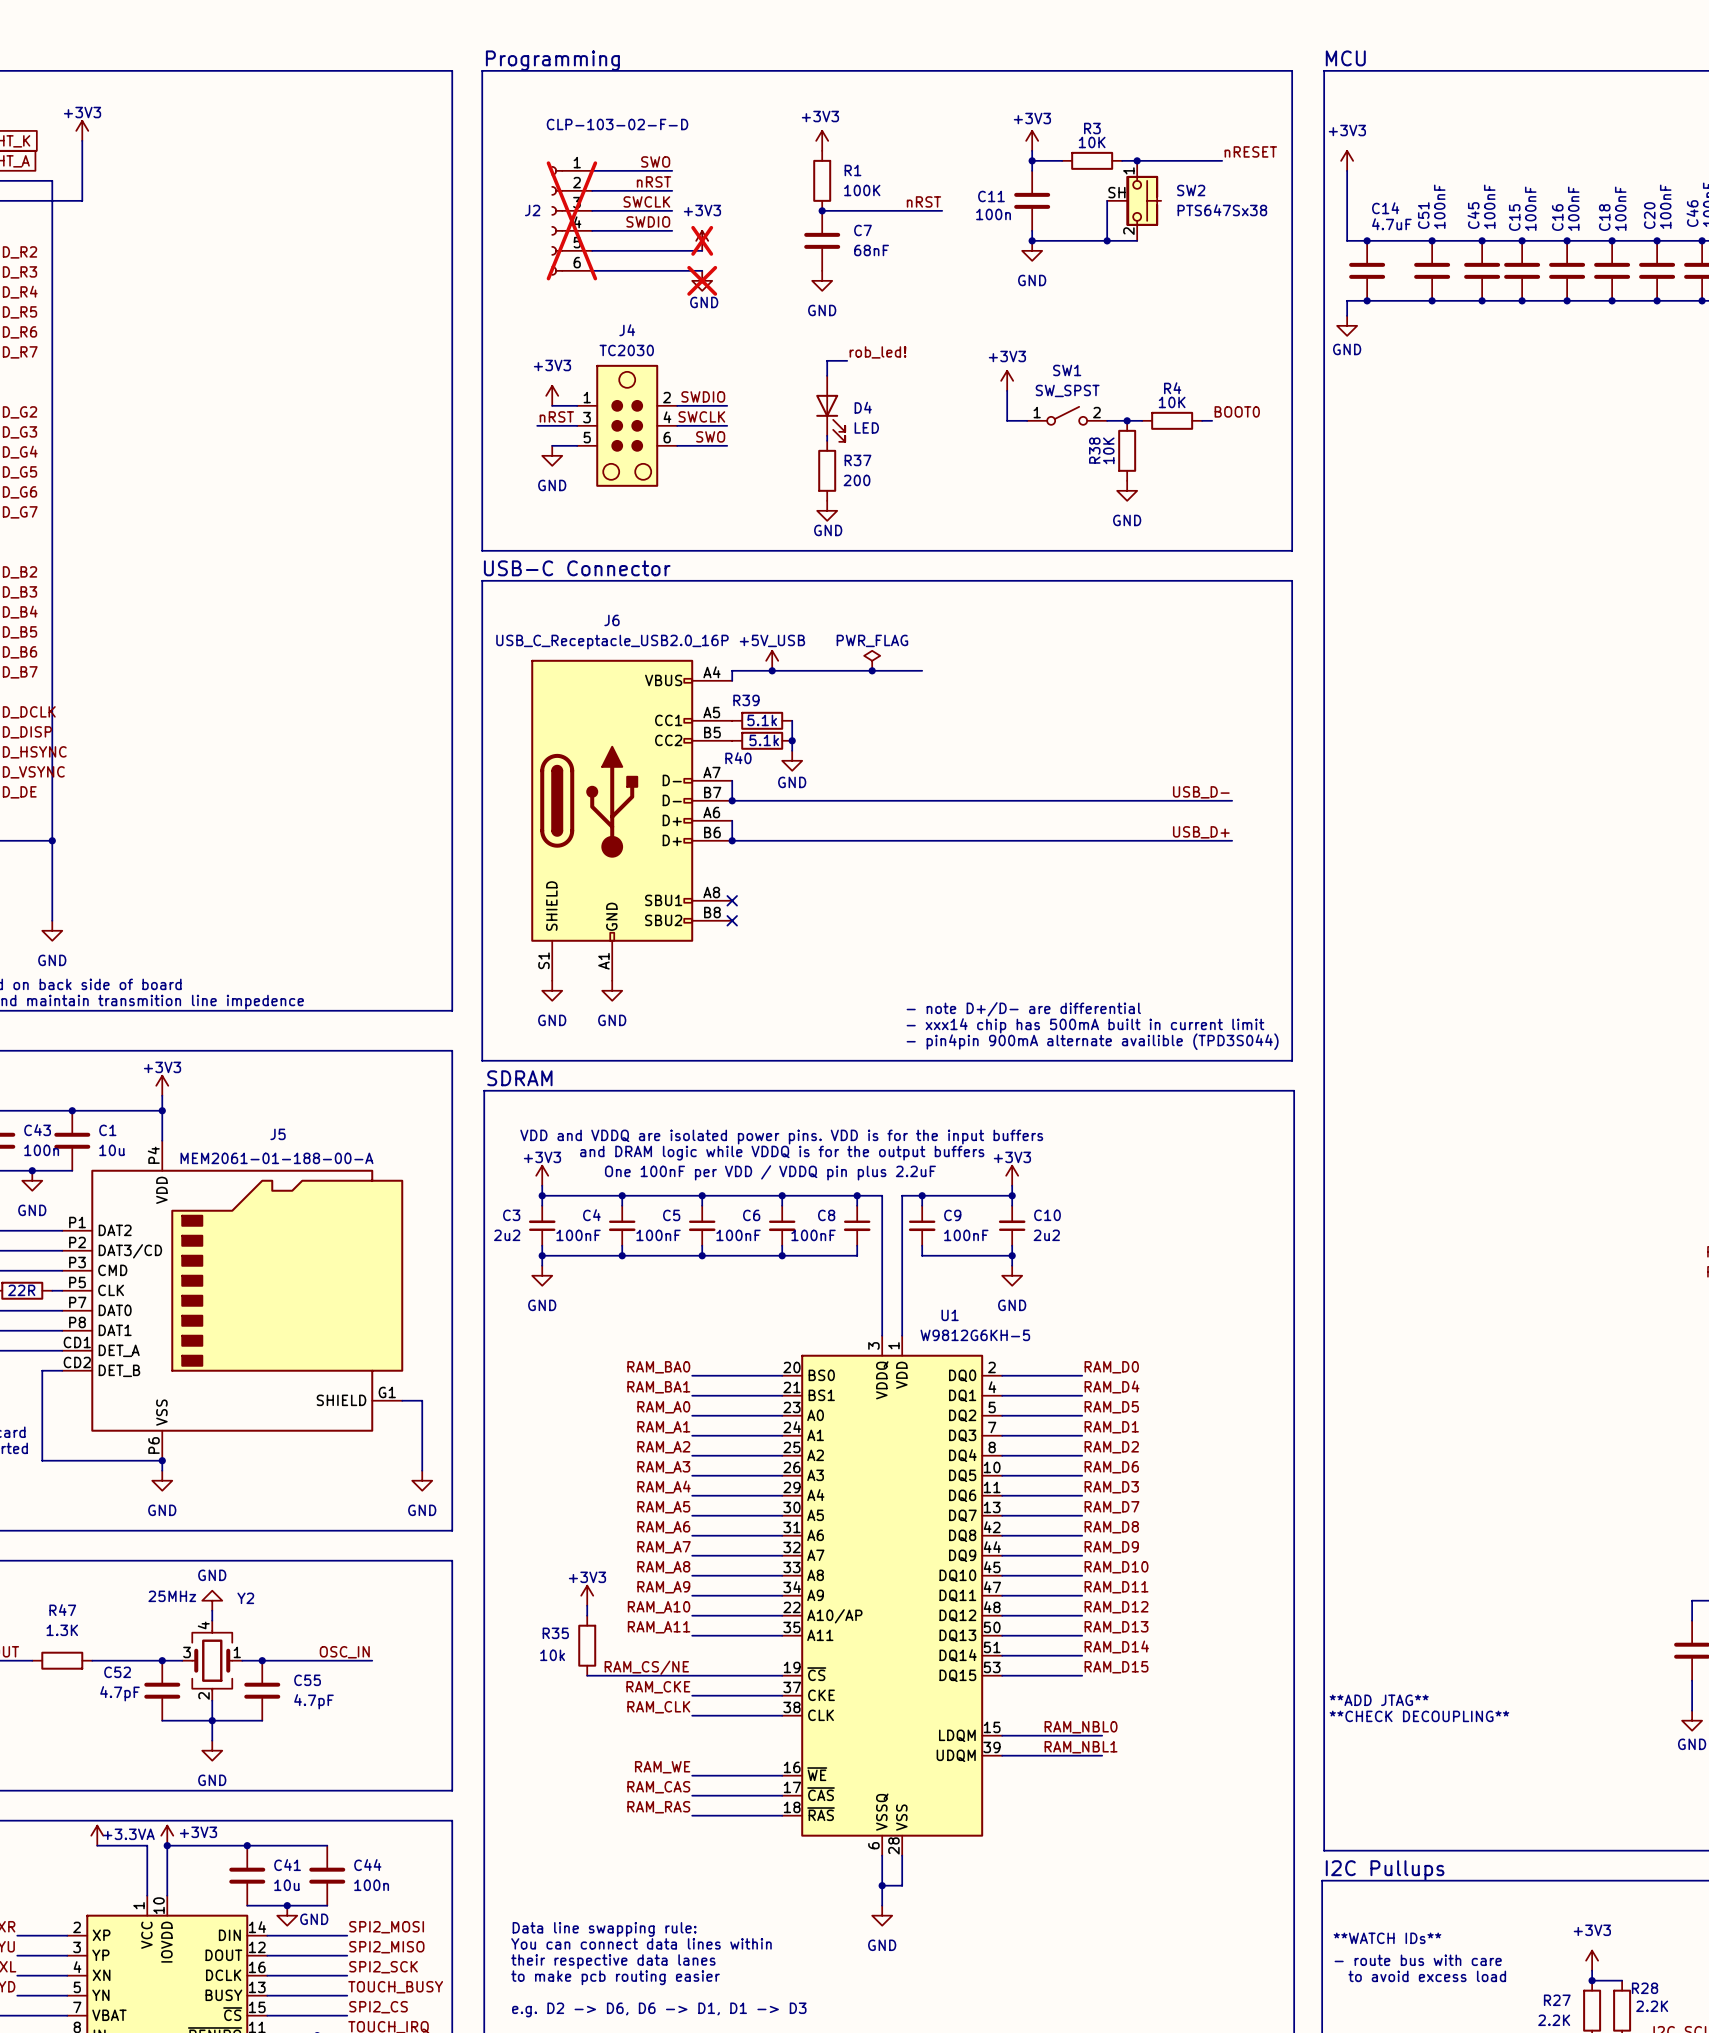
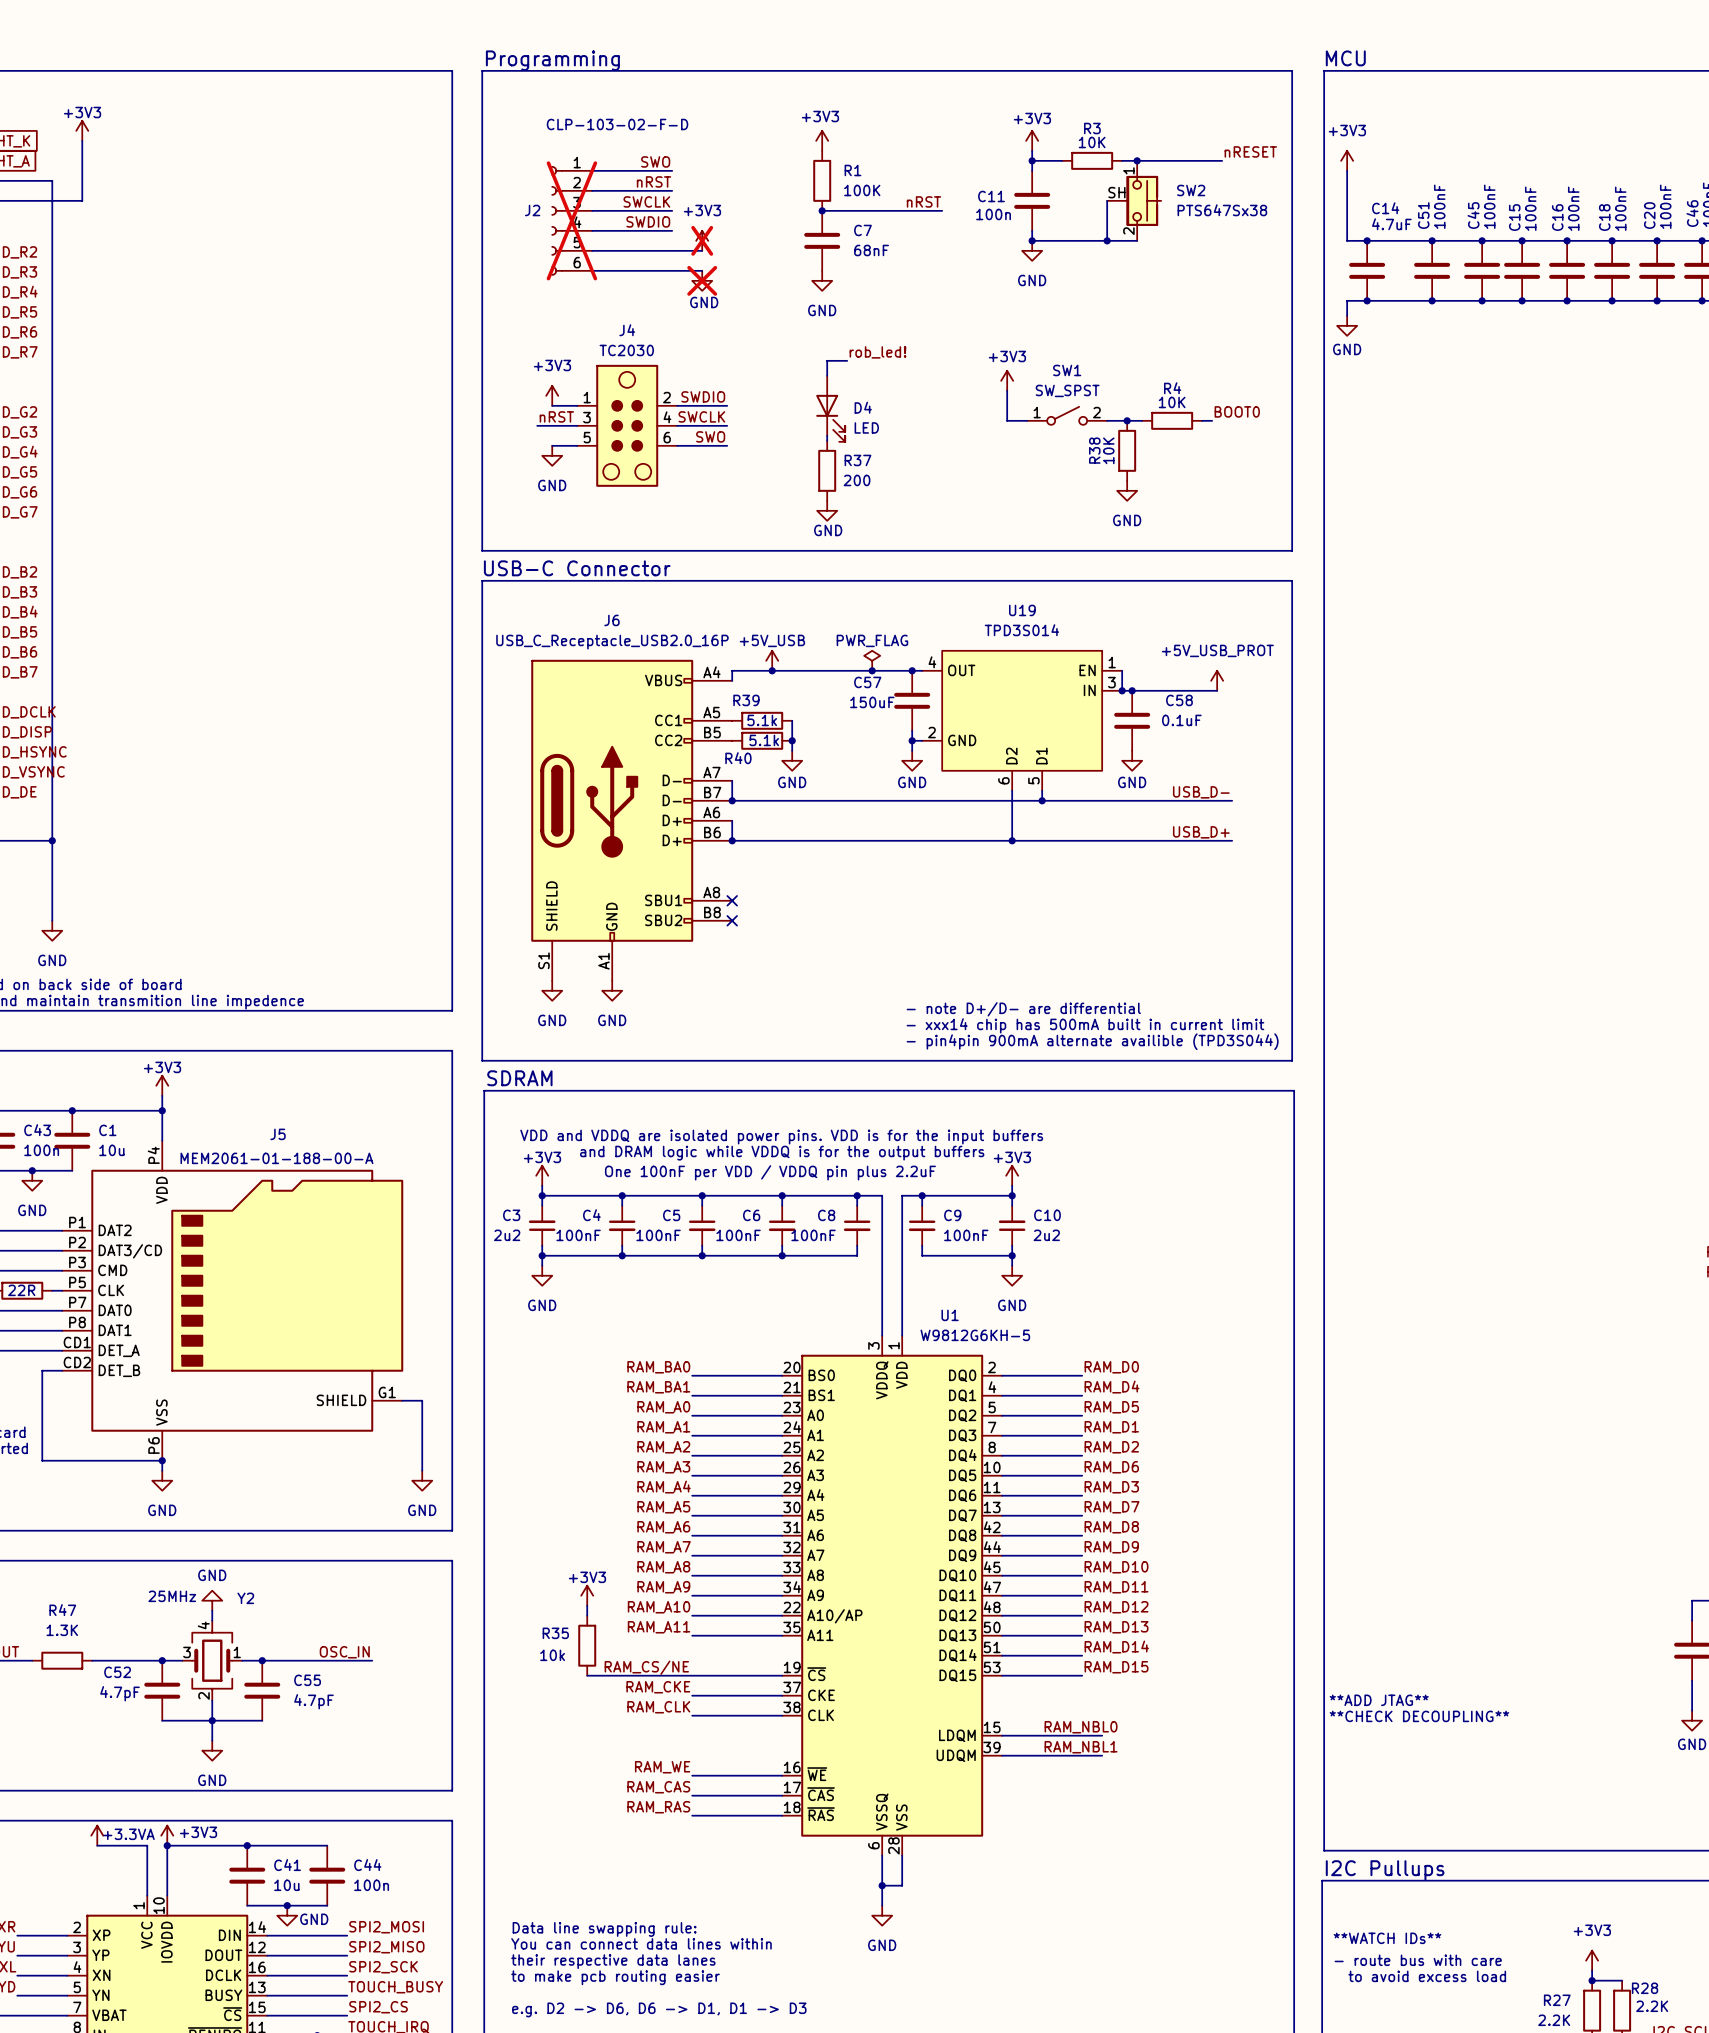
junction: none -> (912, 670)
wire: none -> (1122, 670) (1122, 690) (1217, 690)
power symbol: none -> +5V_USB_PROT (1217, 680)
junction: none -> (1122, 690)
junction: none -> (1132, 690)
C57: none -> 150uF (912, 700)
U19: none -> TPD3S014 (1022, 720)
C58: none -> 0.1uF (1132, 720)
wire: none -> (912, 730) (912, 750)
wire: none -> (912, 740) (922, 740)
junction: none -> (912, 740)
power symbol: none -> GND (912, 760)
power symbol: none -> GND (1132, 760)
wire: none -> (1012, 790) (1012, 840)
wire: none -> (1042, 790) (1042, 800)
junction: none -> (1042, 800)
junction: none -> (1012, 840)

